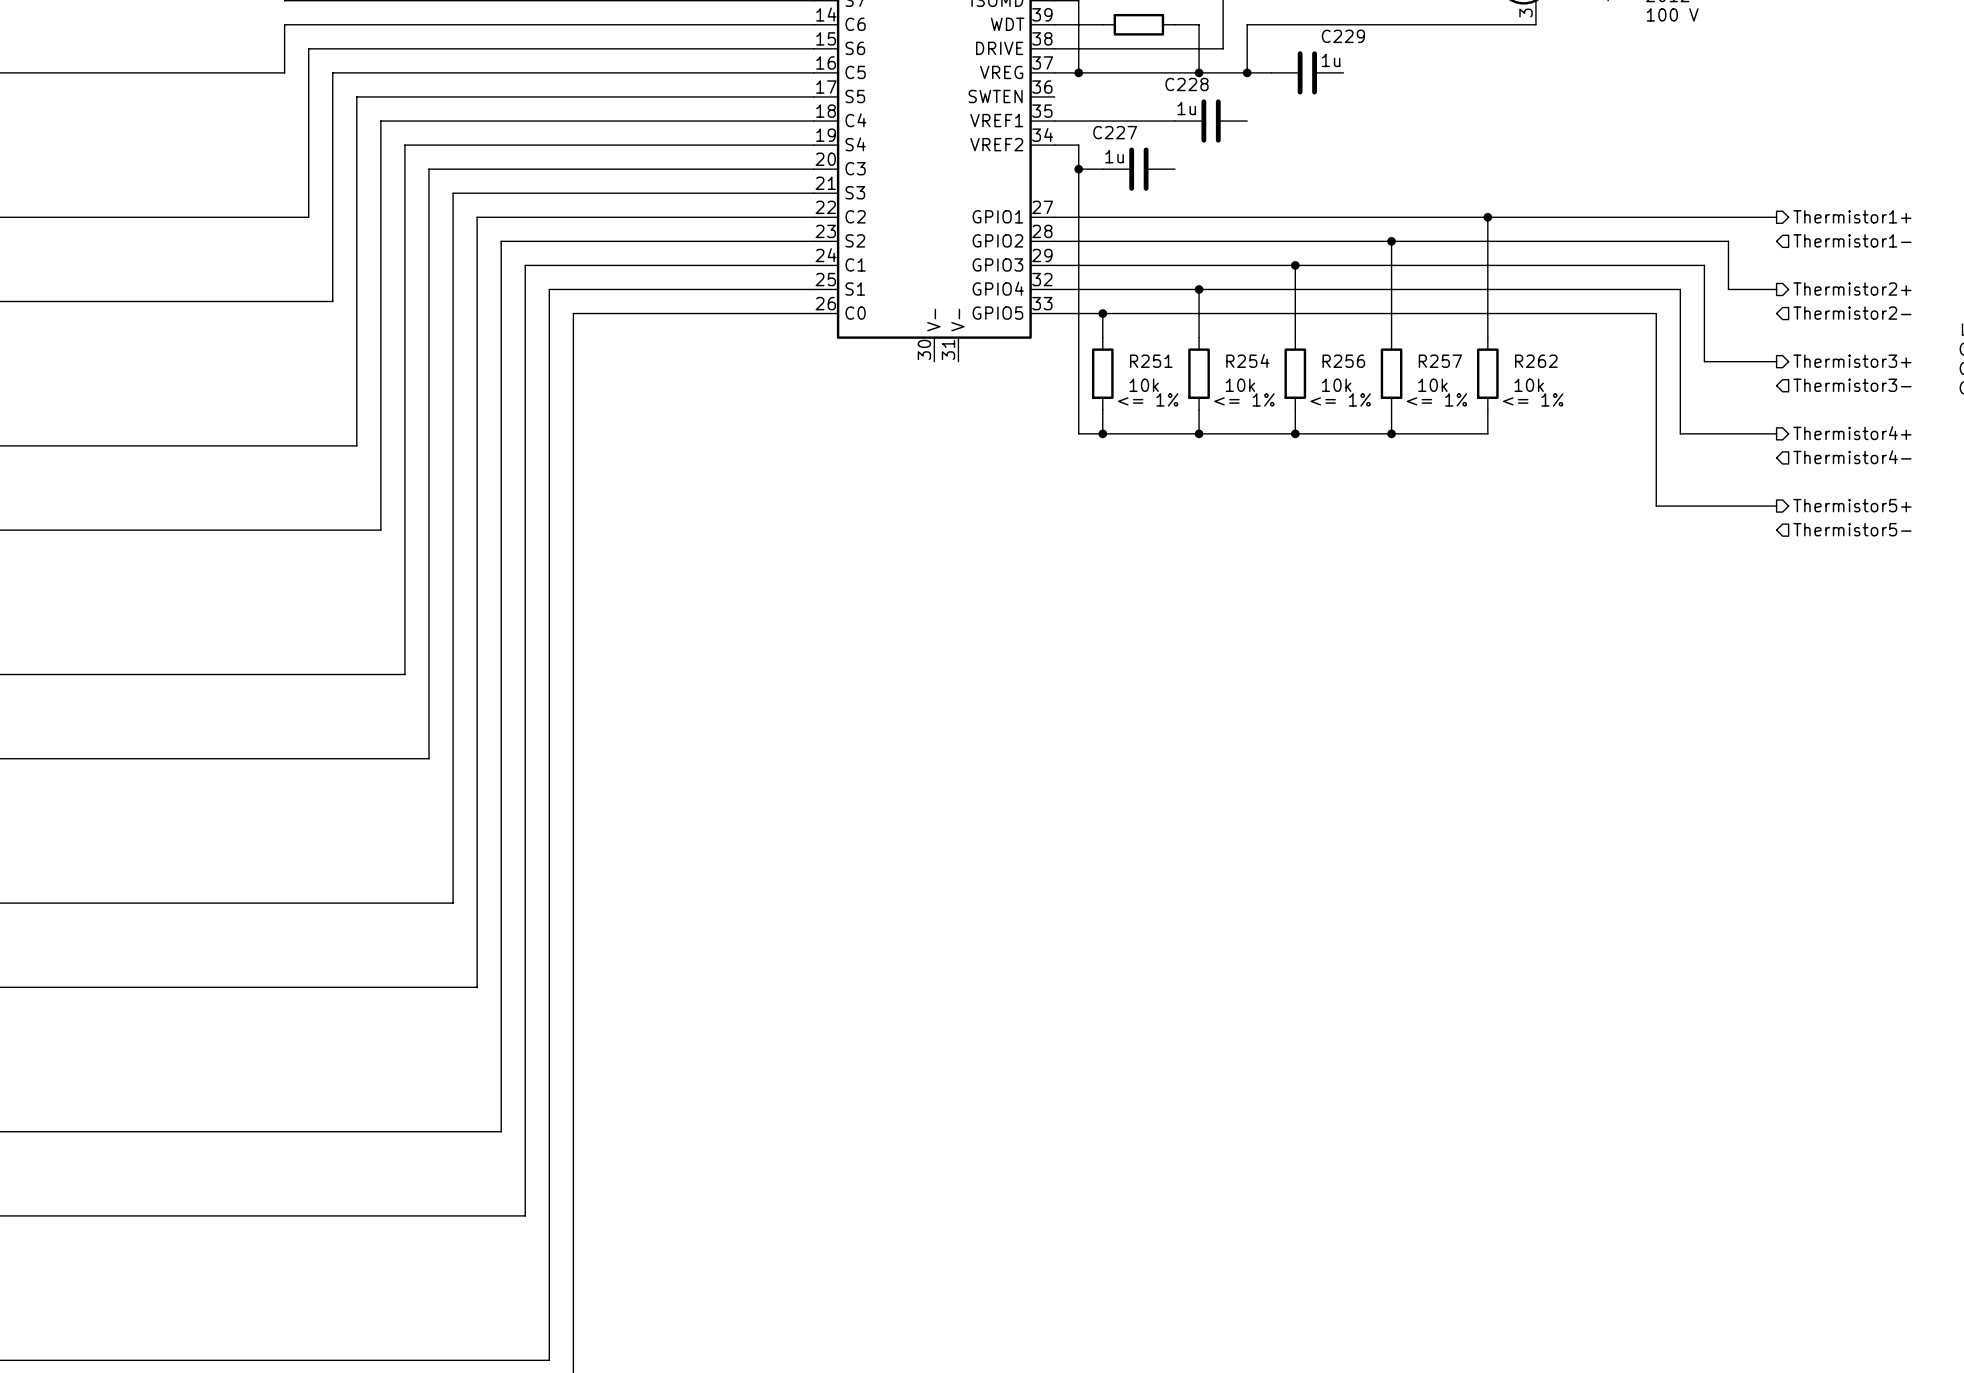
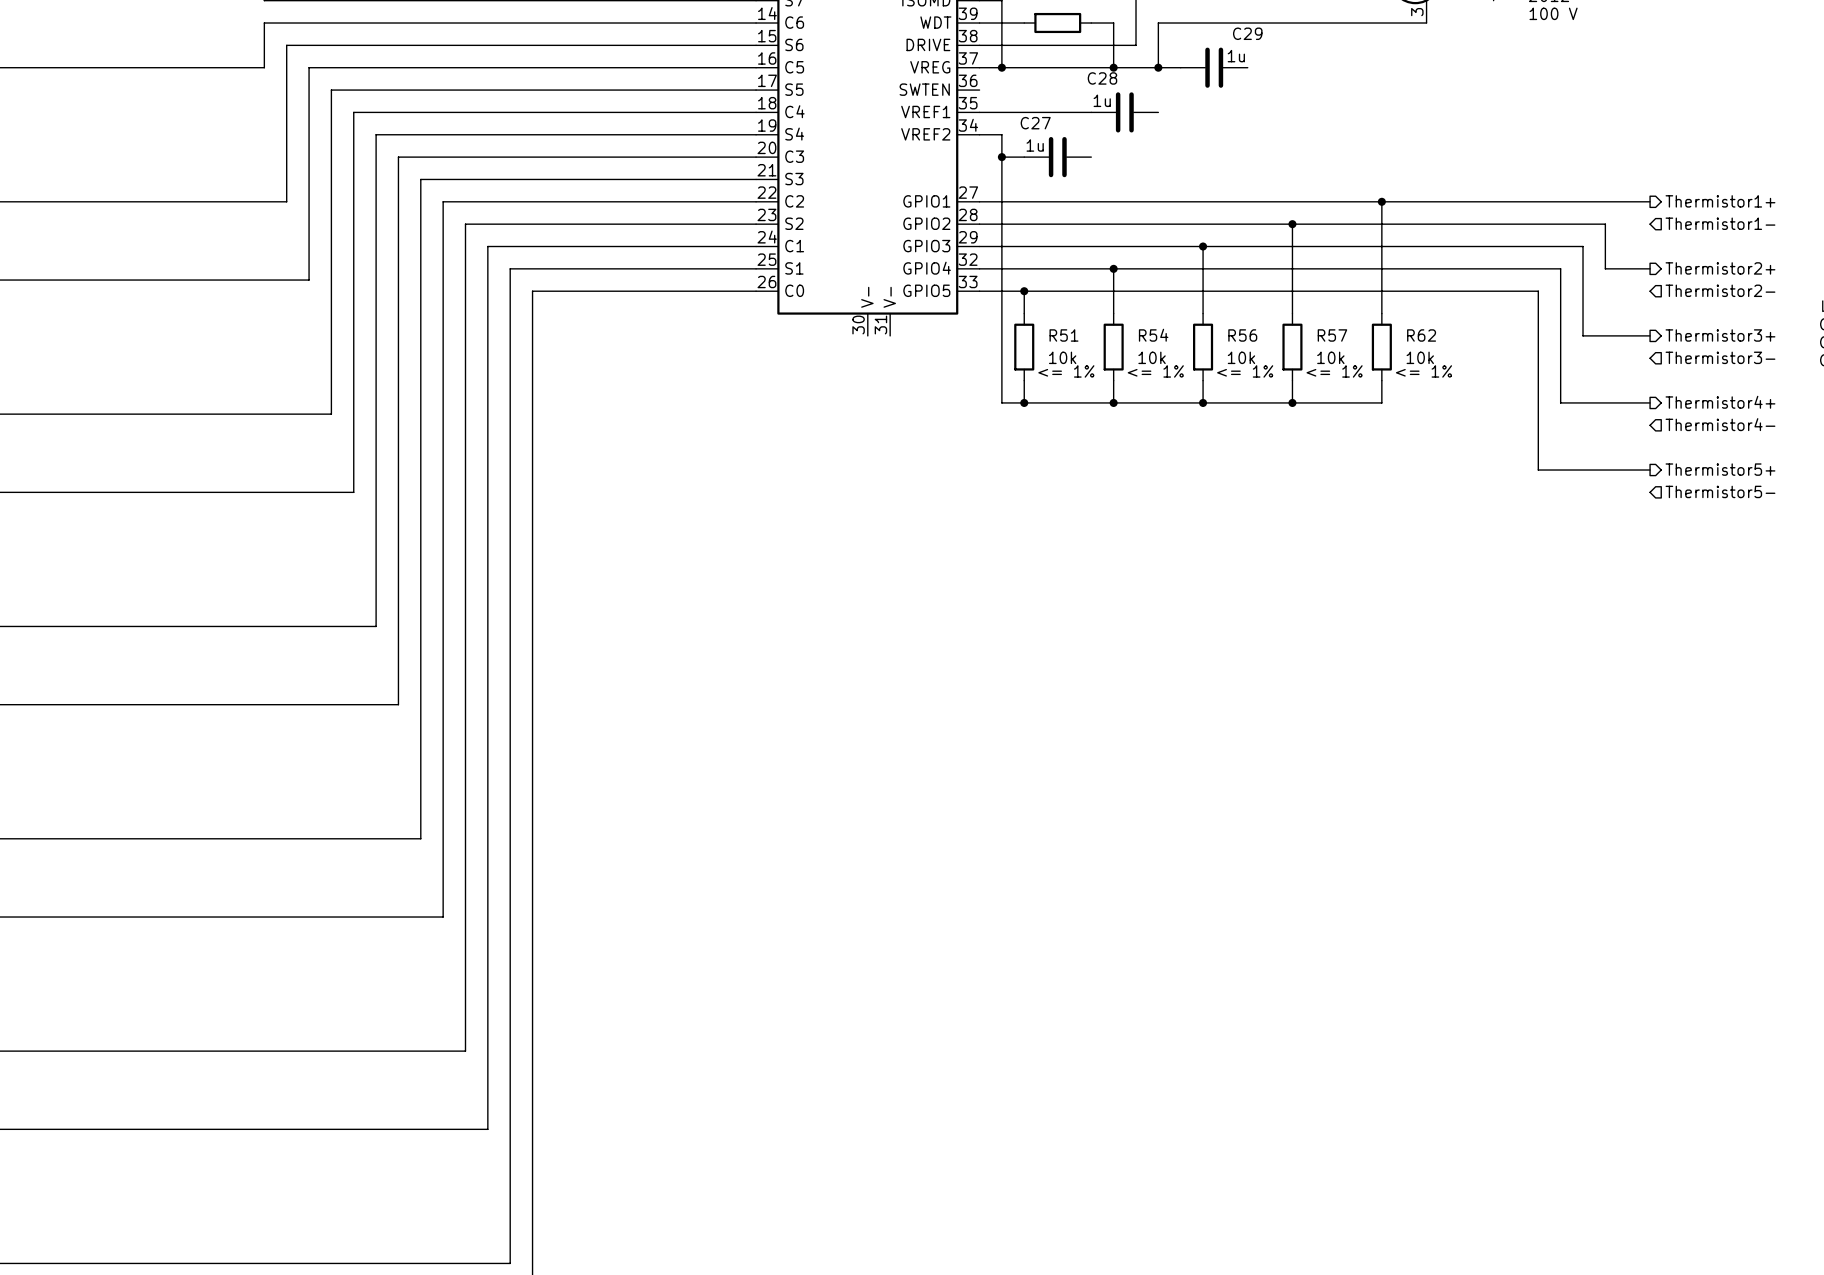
C229 name: C229 (1343, 36) -> C29 (1247, 33)
C228 name: C228 (1187, 84) -> C28 (1102, 78)
C227 name: C227 (1115, 132) -> C27 (1035, 123)
R254 name: R254 (1247, 360) -> R54 (1153, 335)
R251 name: R251 (1151, 361) -> R51 (1063, 335)
R256 name: R256 (1343, 361) -> R56 (1242, 335)
R257 name: R257 (1440, 361) -> R57 (1332, 335)
R262 name: R262 (1536, 361) -> R62 (1421, 335)

